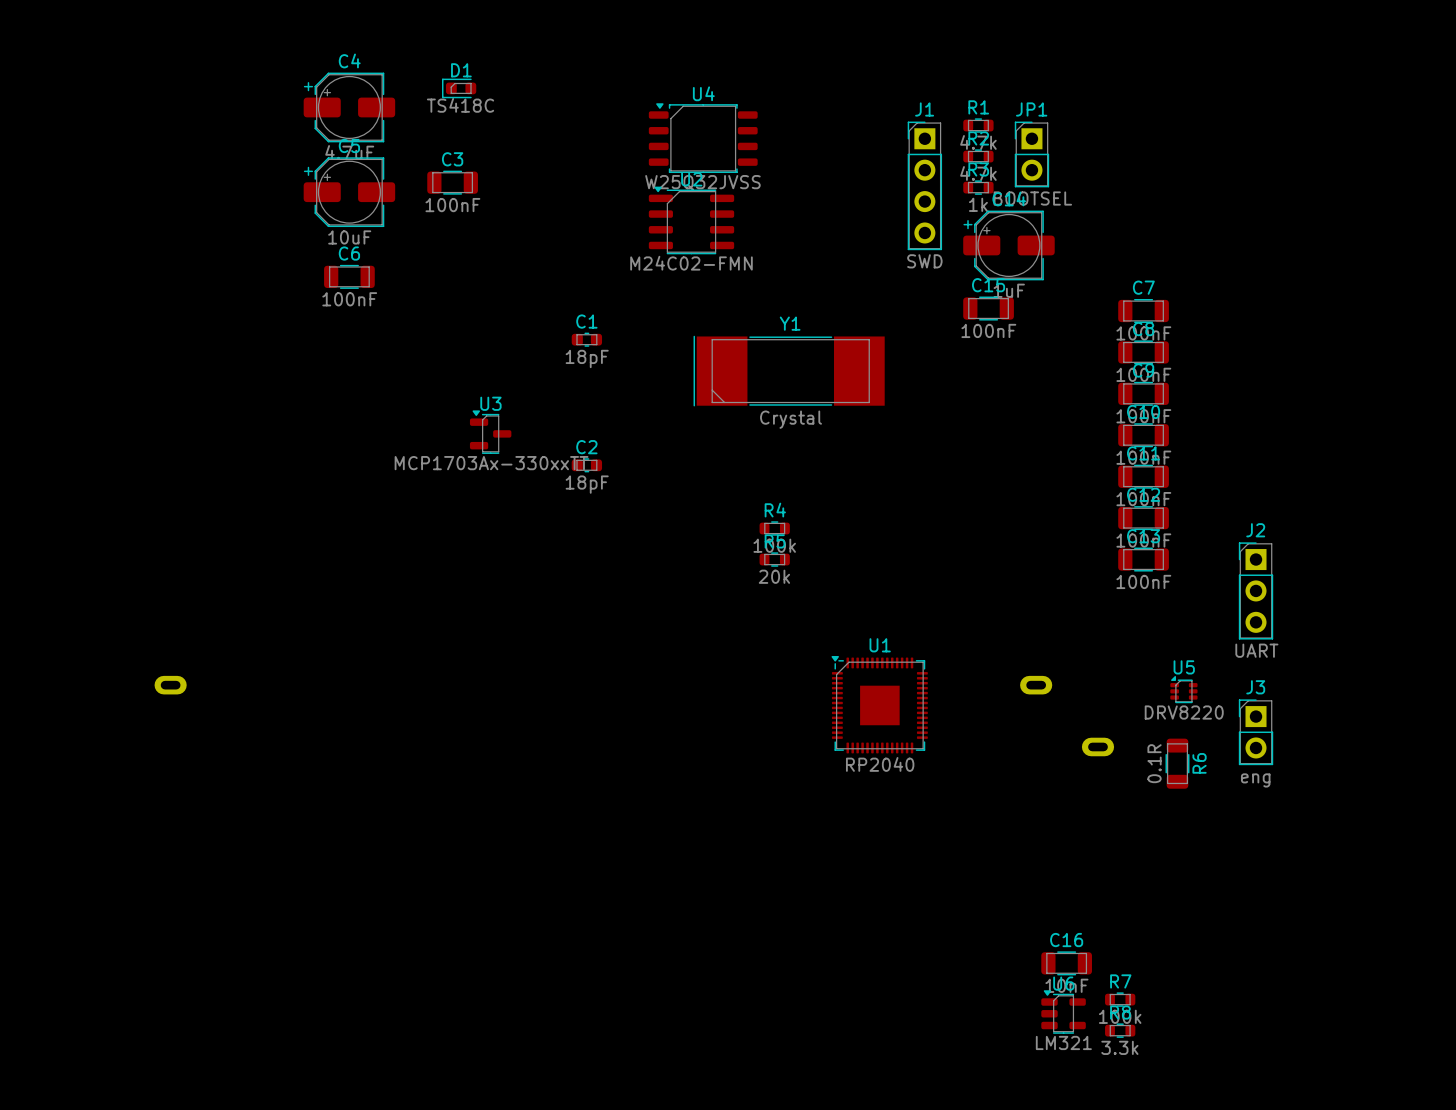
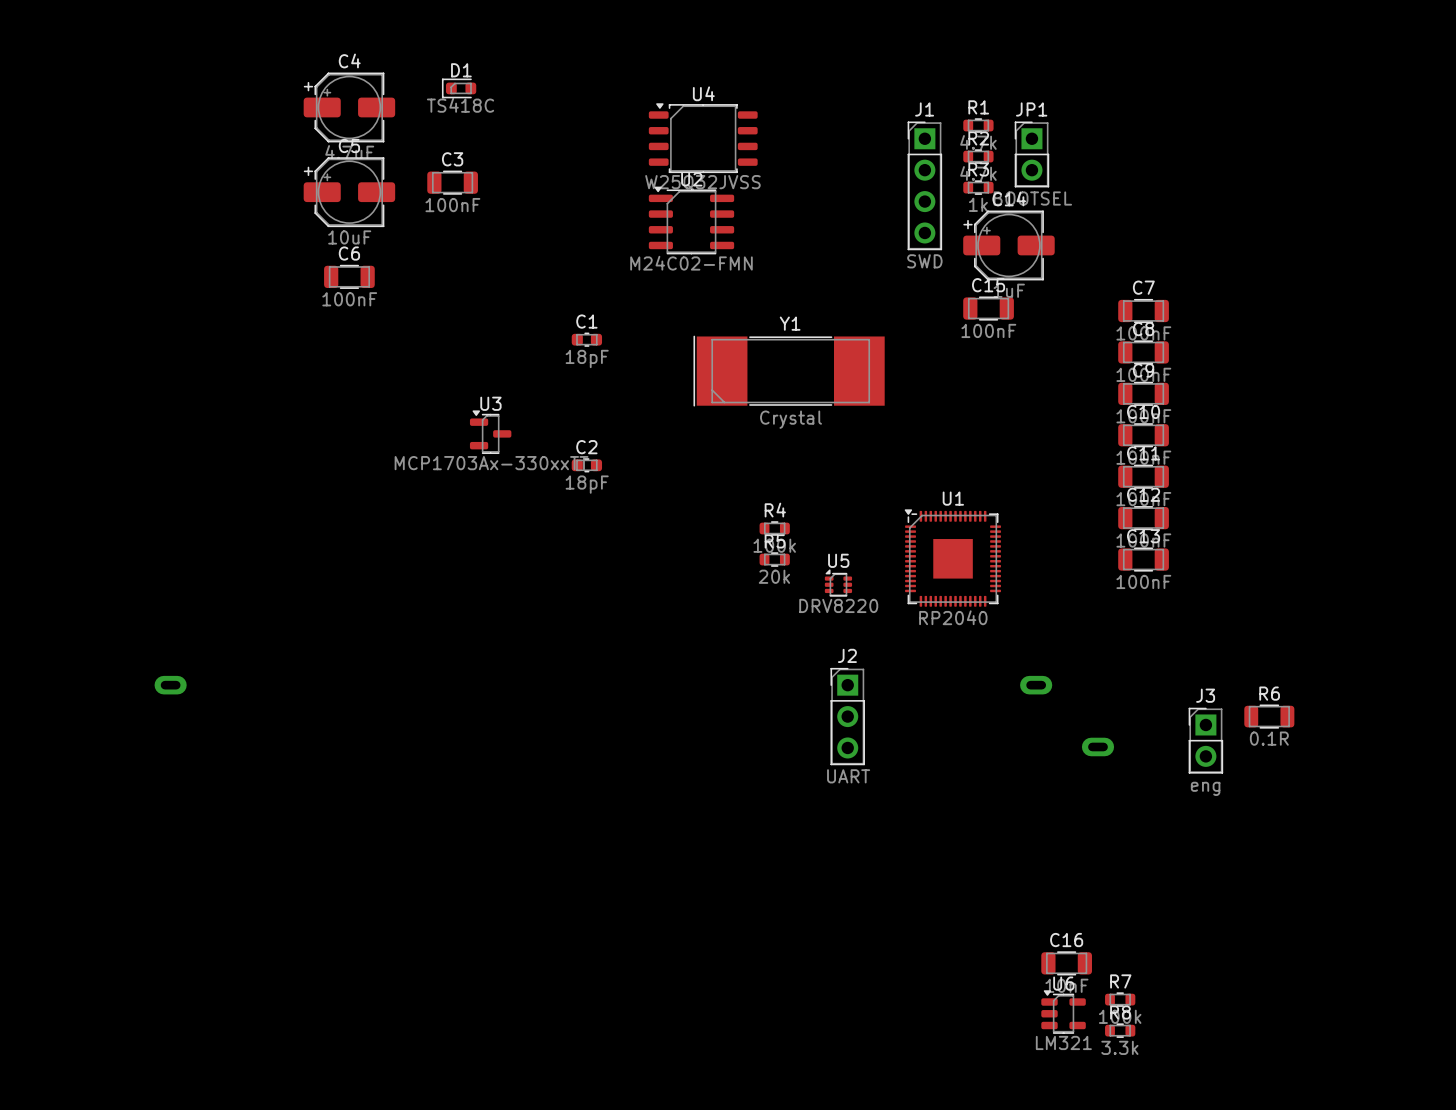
J2 position: (1256, 590) -> (847, 716)
U5 position: (1183, 689) -> (838, 583)
U1 position: (879, 704) -> (952, 558)
J3 position: (1256, 732) -> (1205, 740)
R6 value position: 0.1R (1154, 763) -> 0.1R (1269, 738)
R6 rotation: 0° (1177, 763) -> 90° clockwise (1269, 716)
R6 position: (1177, 763) -> (1269, 716)
R6 name position: R6 (1199, 763) -> R6 (1269, 693)

